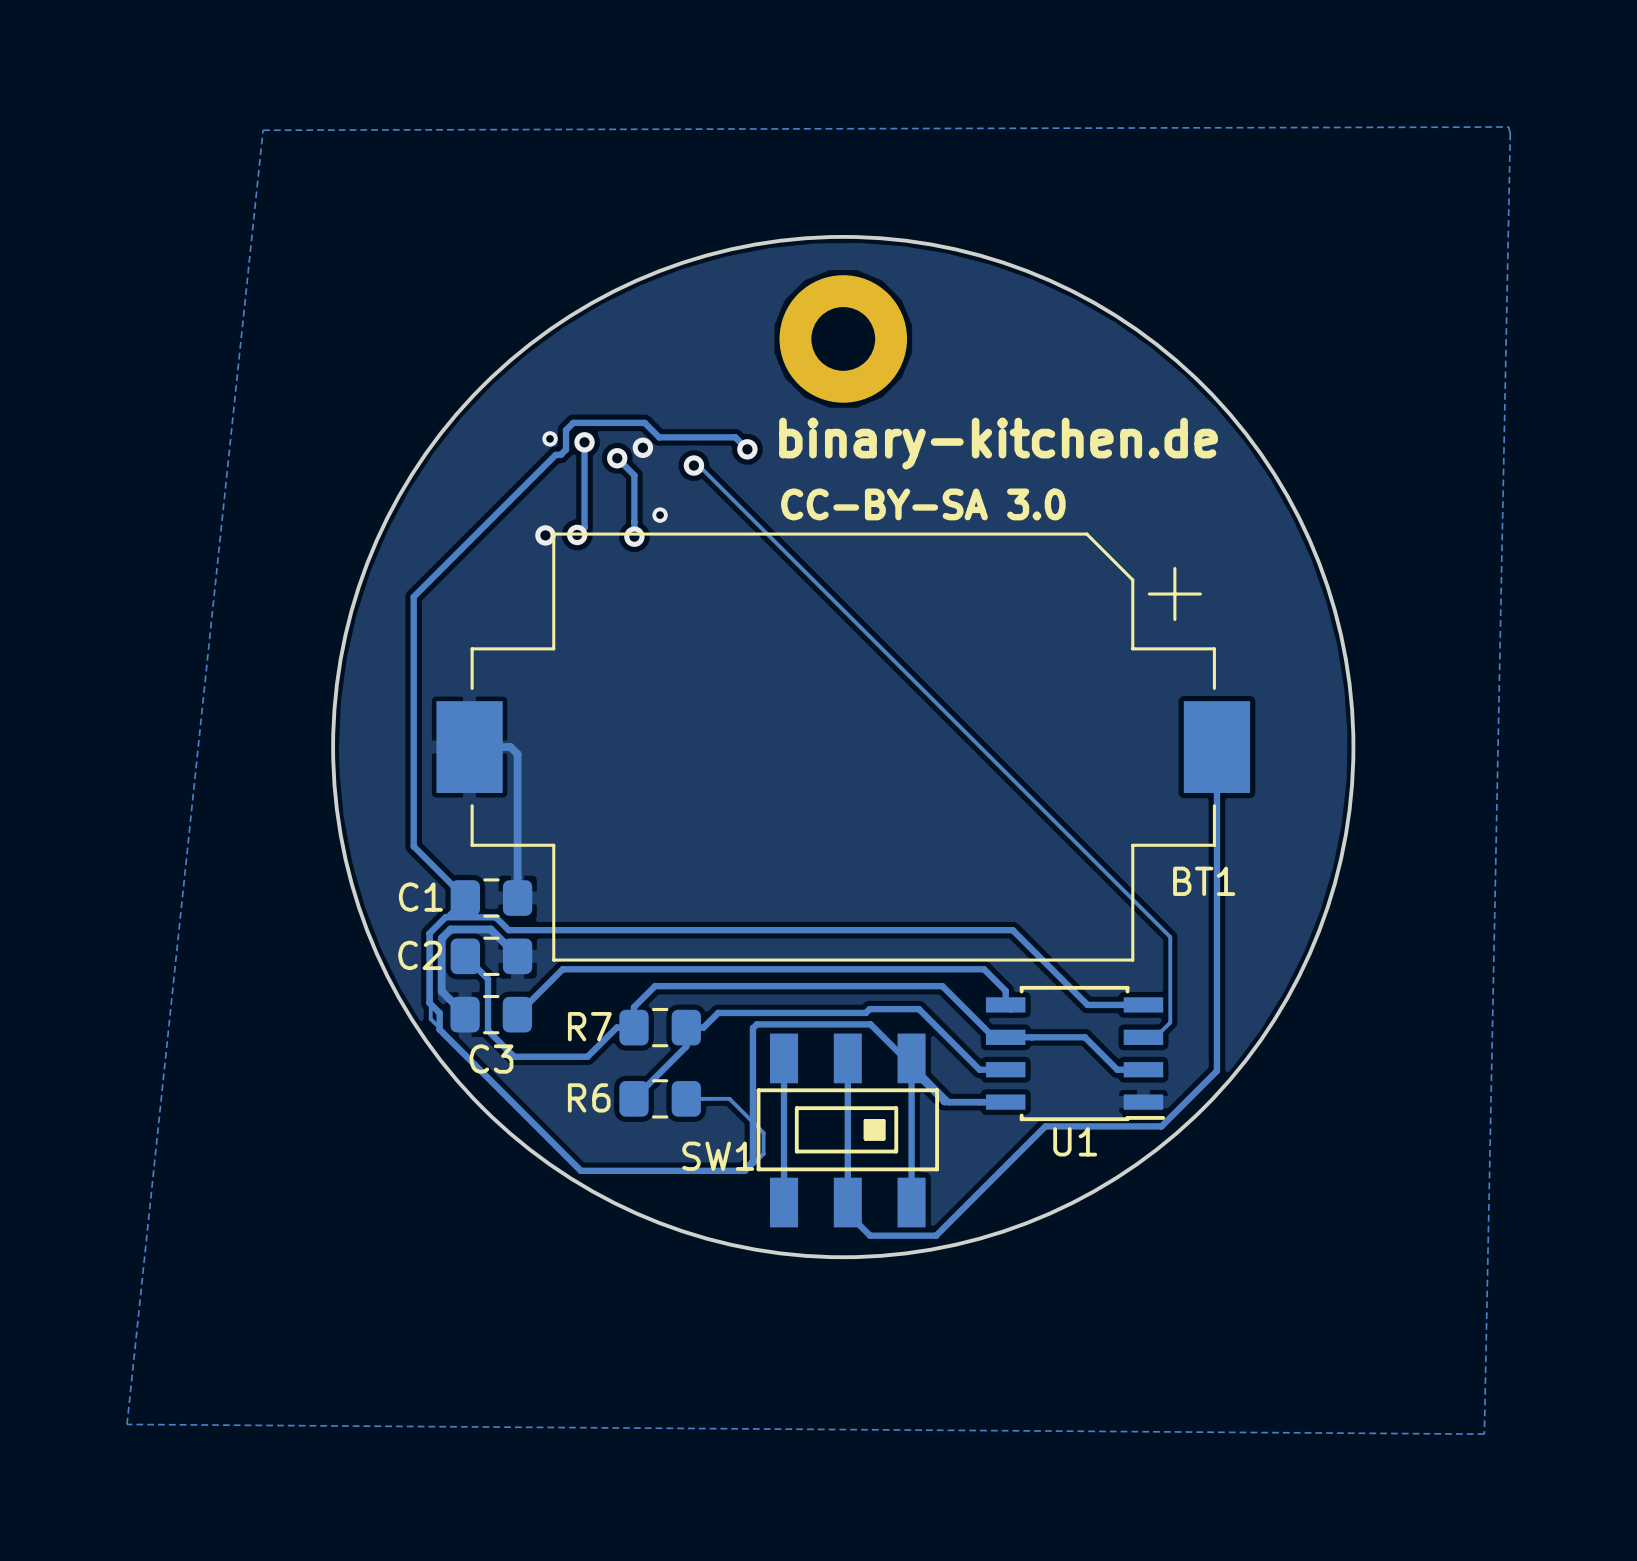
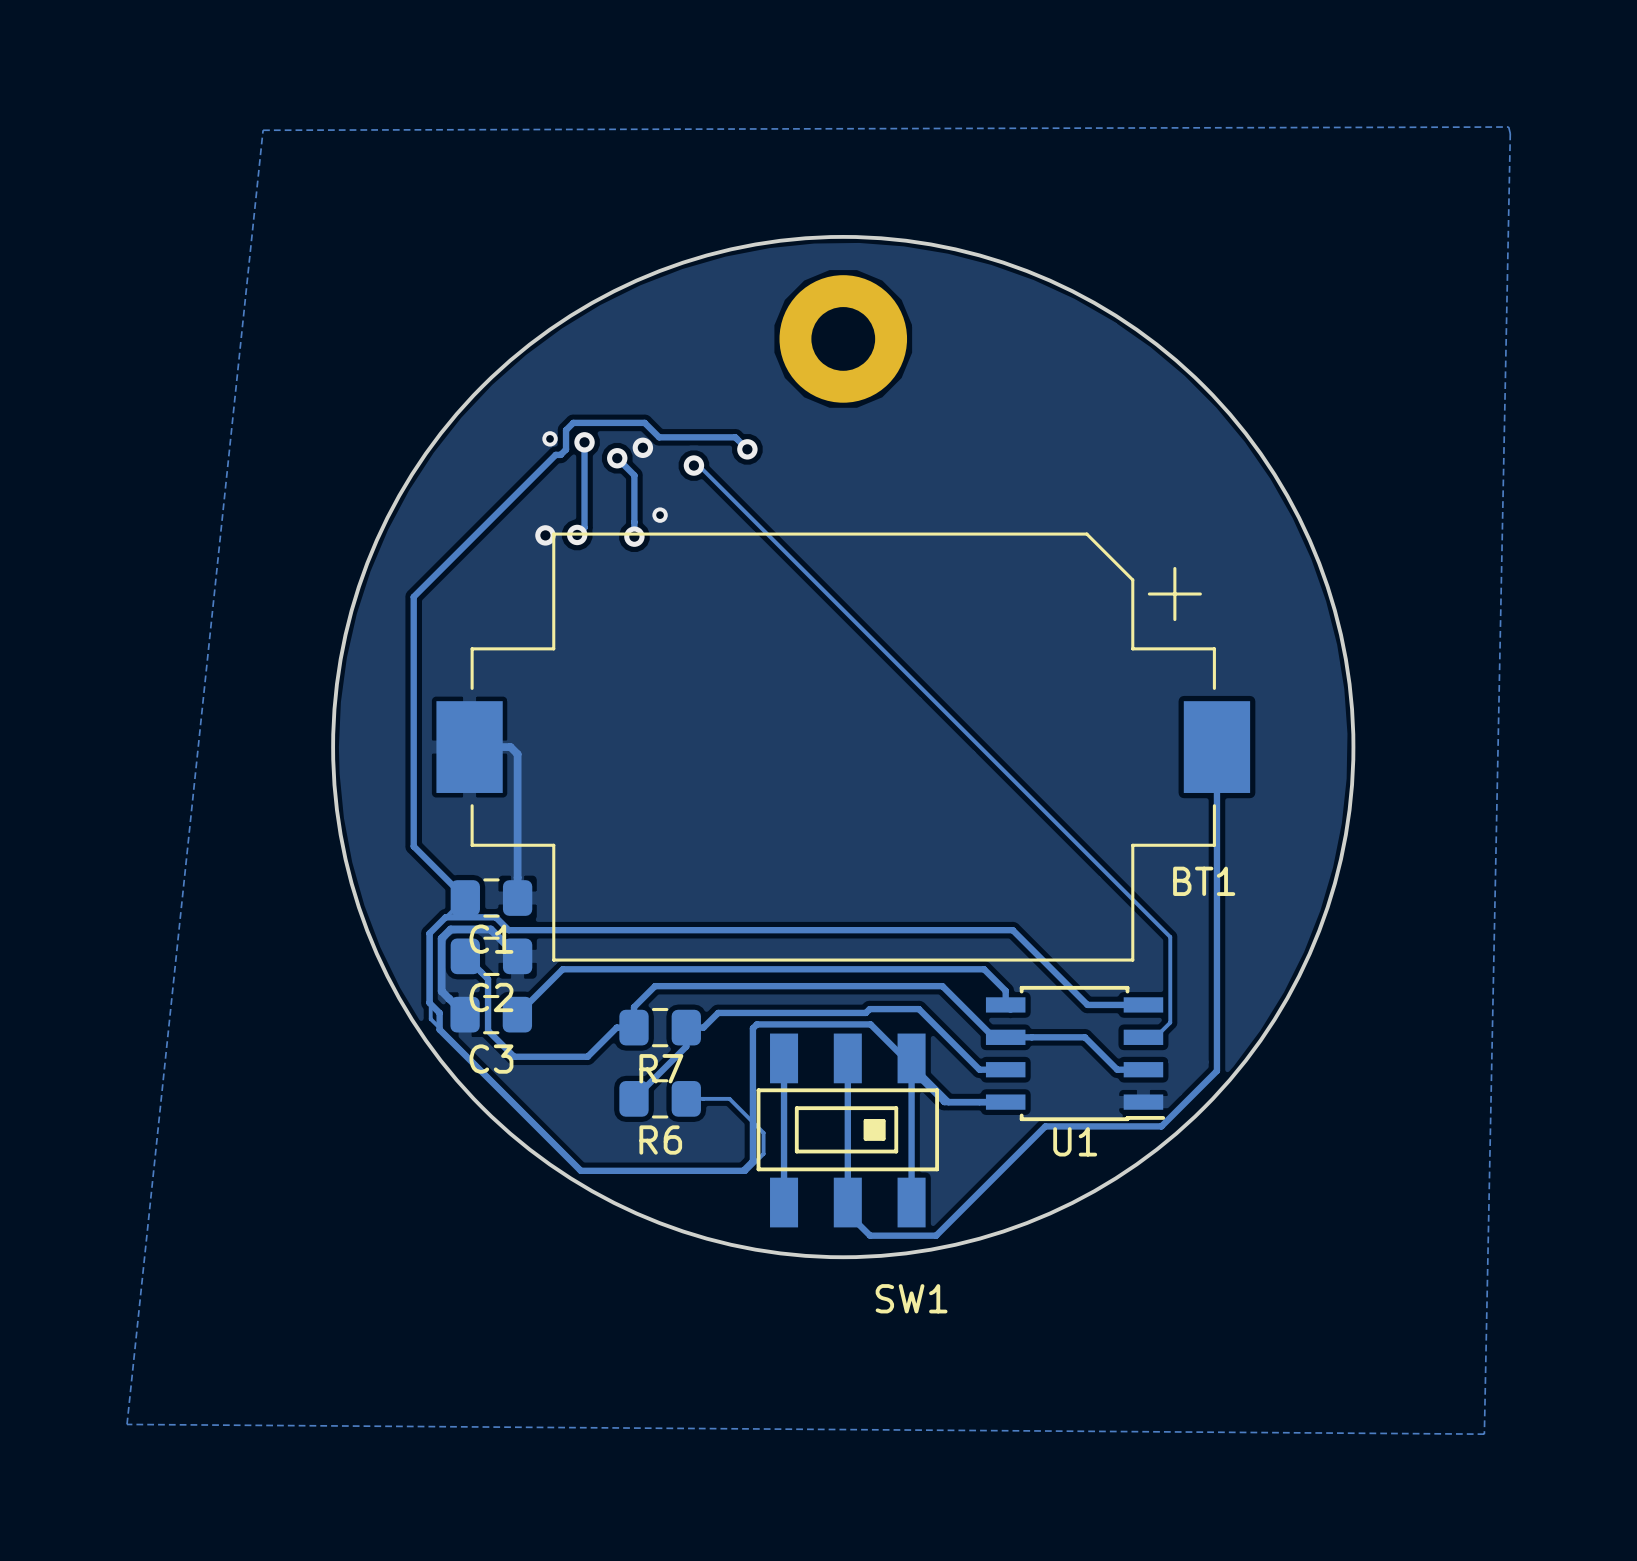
text: binary-kitchen.de (998, 443) -> none
text: CC-BY-SA 3.0 (923, 504) -> none
C1 name position: C1 (420, 897) -> C1 (491, 939)
C2 name position: C2 (420, 955) -> C2 (491, 997)
R7 name position: R7 (589, 1026) -> R7 (661, 1068)
R6 name position: R6 (589, 1097) -> R6 (660, 1140)
SW1 name position: SW1 (718, 1156) -> SW1 (911, 1298)

